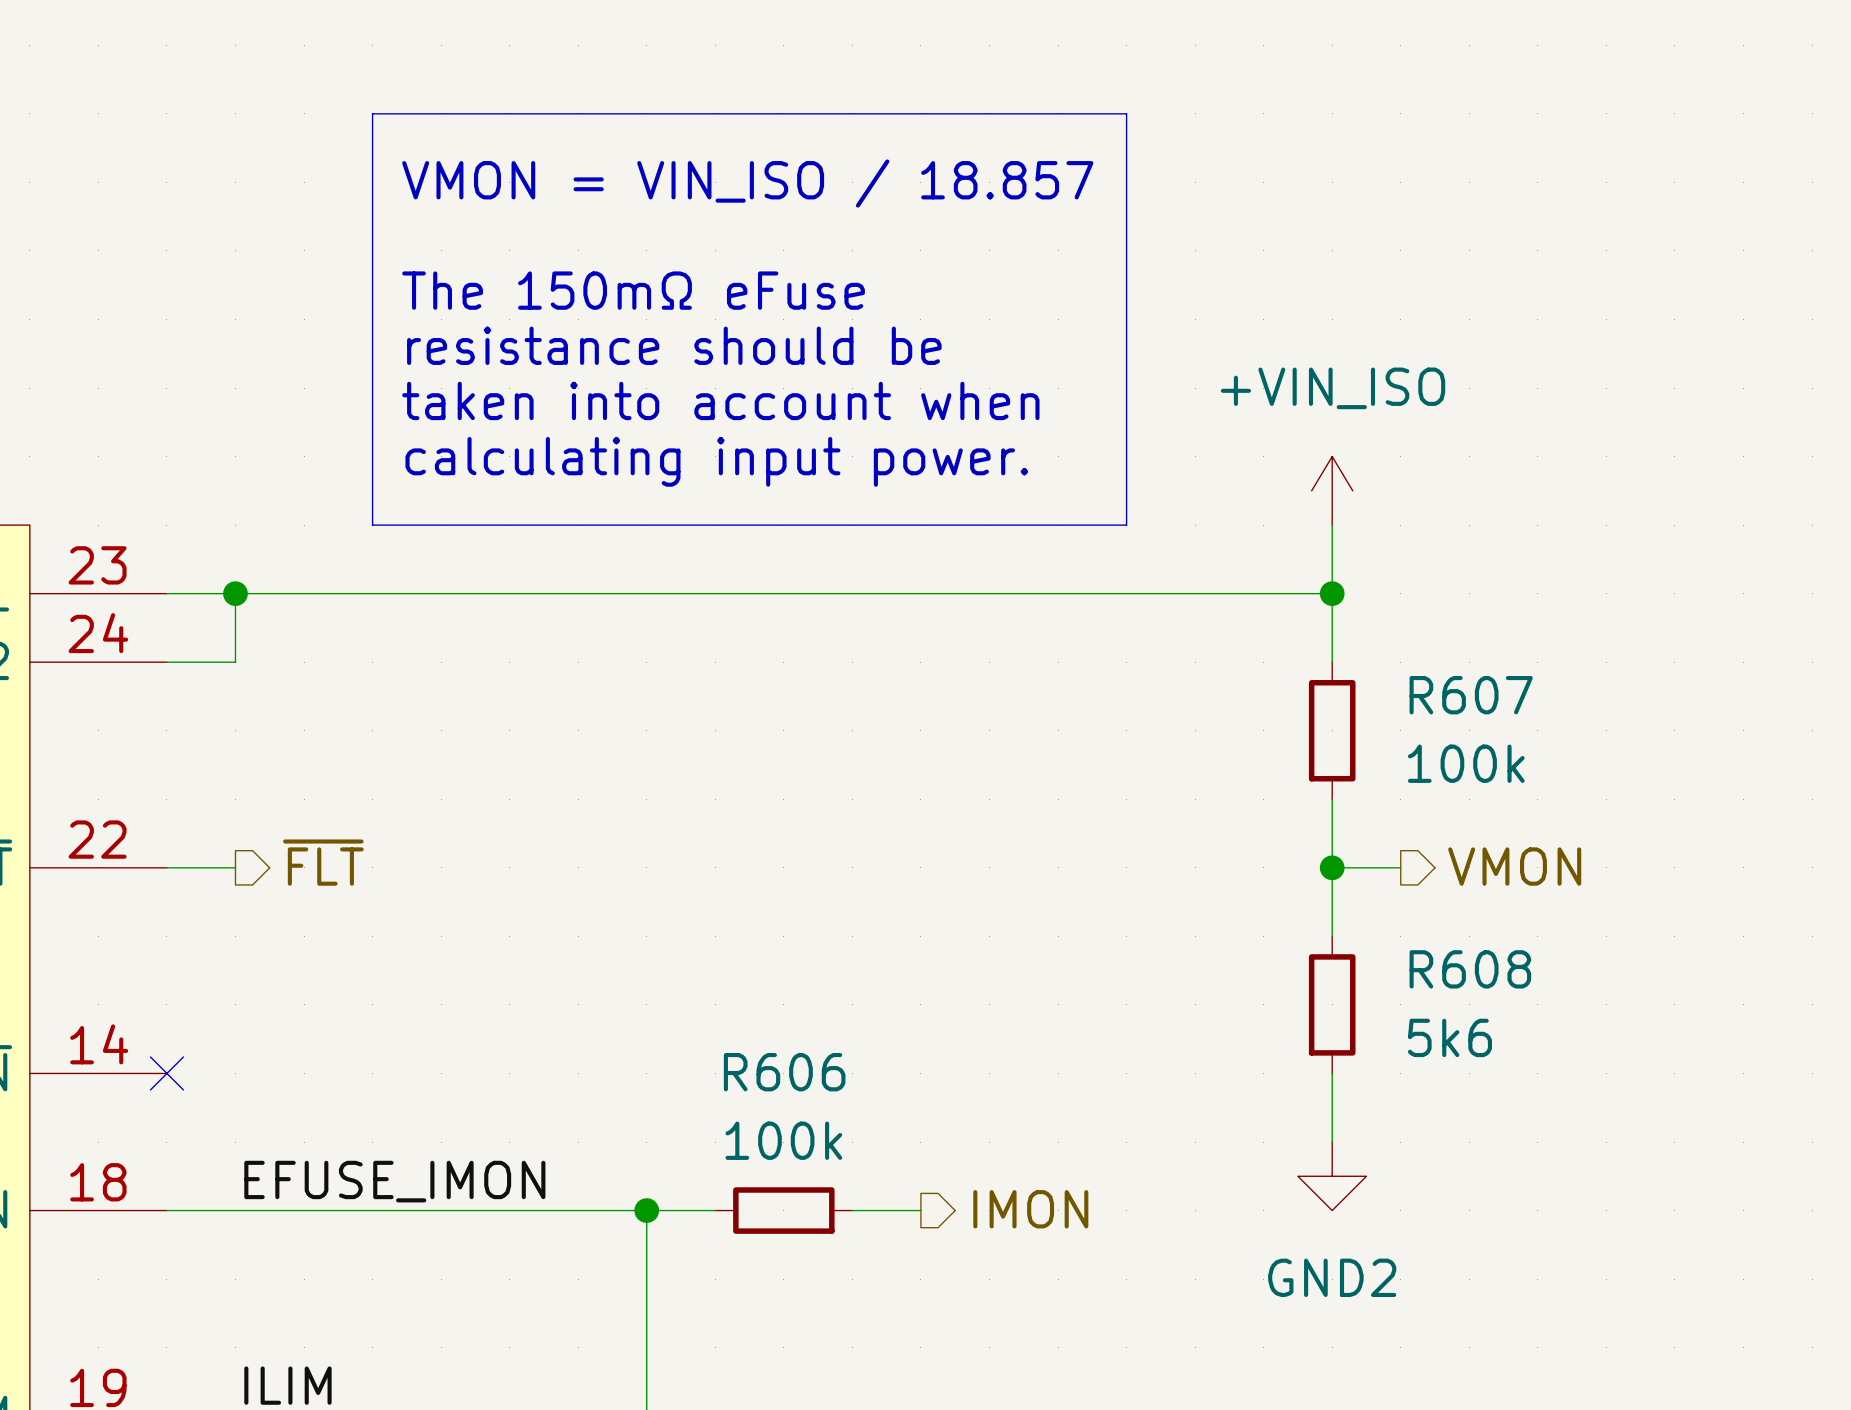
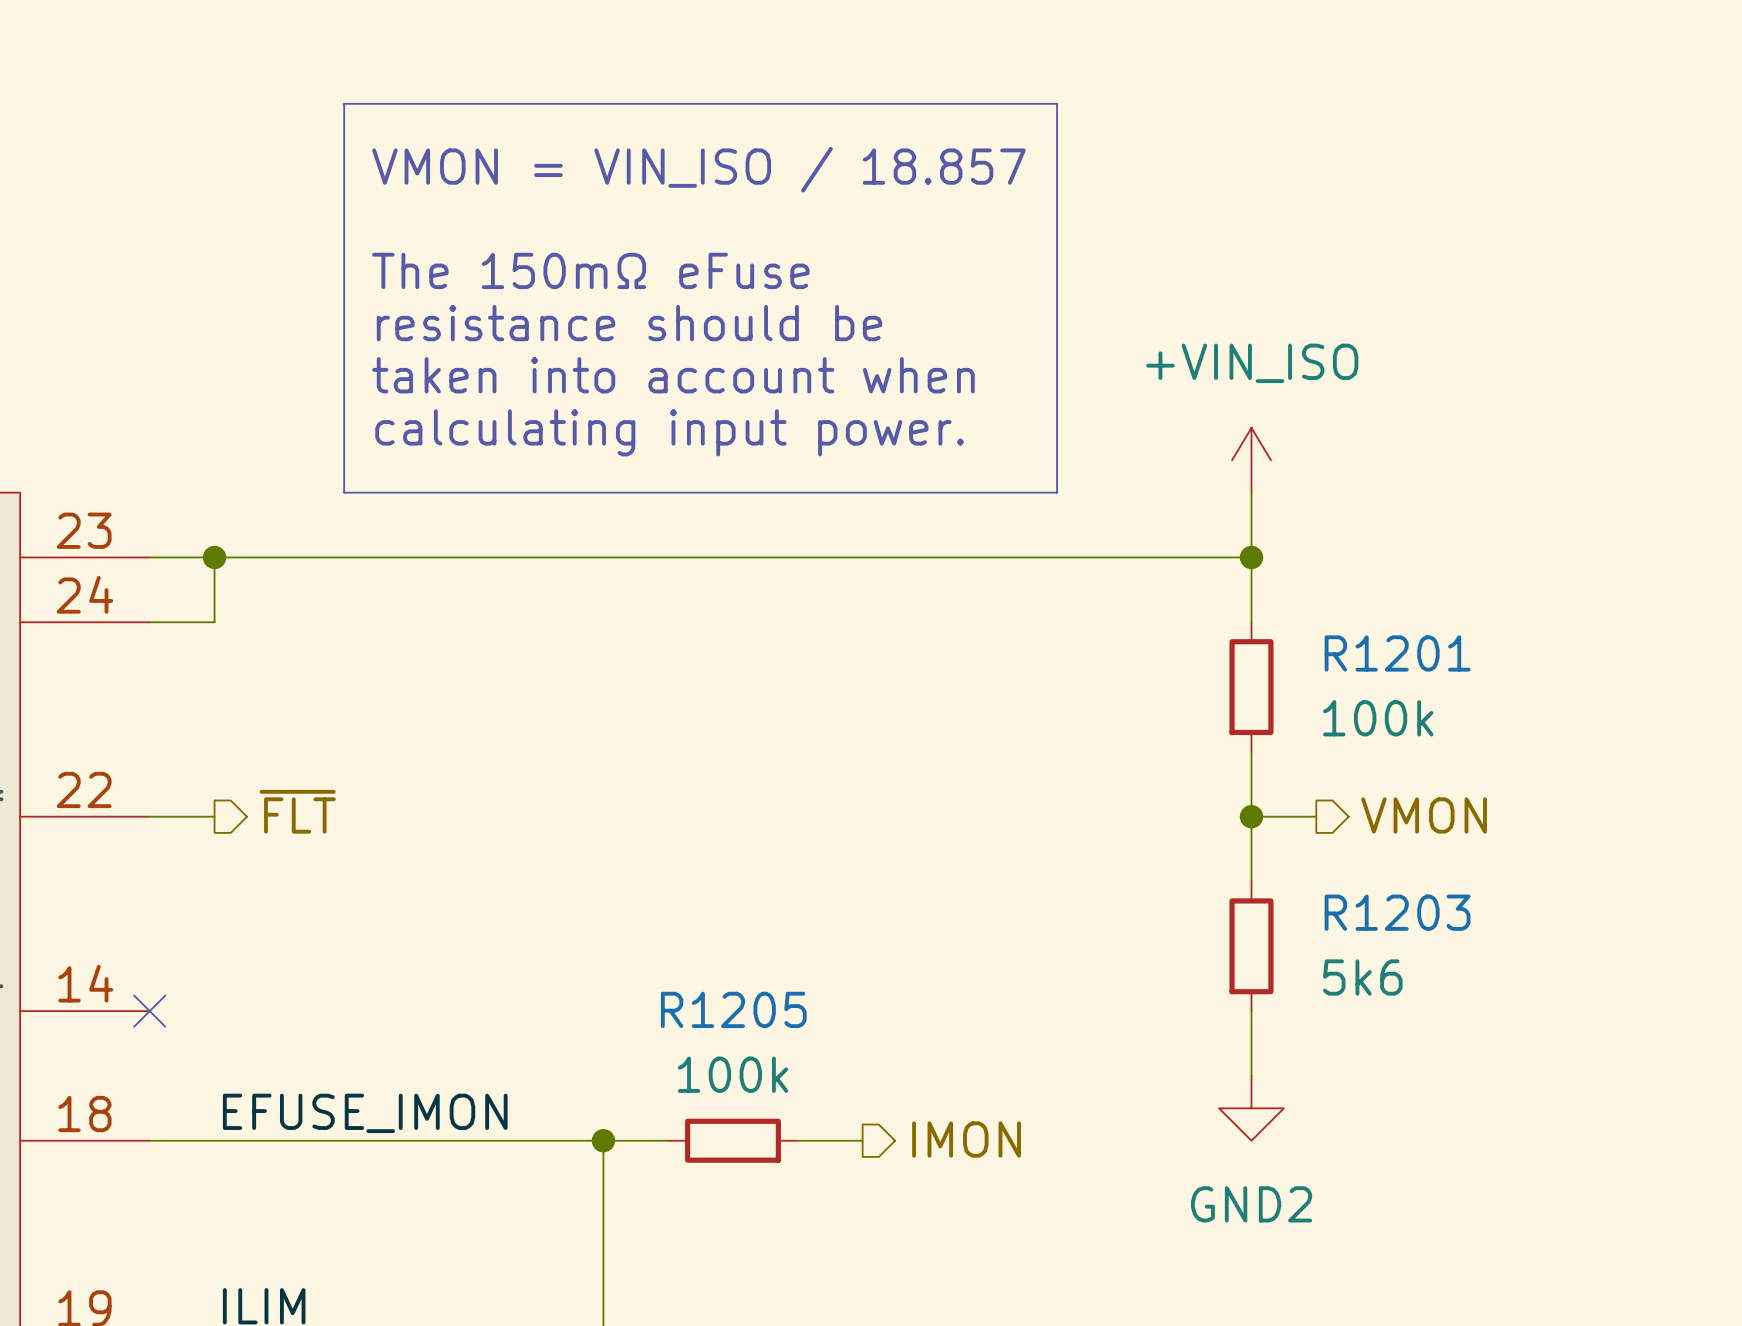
R607 name: R607 (1471, 695) -> R1201 (1397, 653)
R608 name: R608 (1470, 969) -> R1203 (1397, 912)
R606 name: R606 (784, 1072) -> R1205 (733, 1009)

